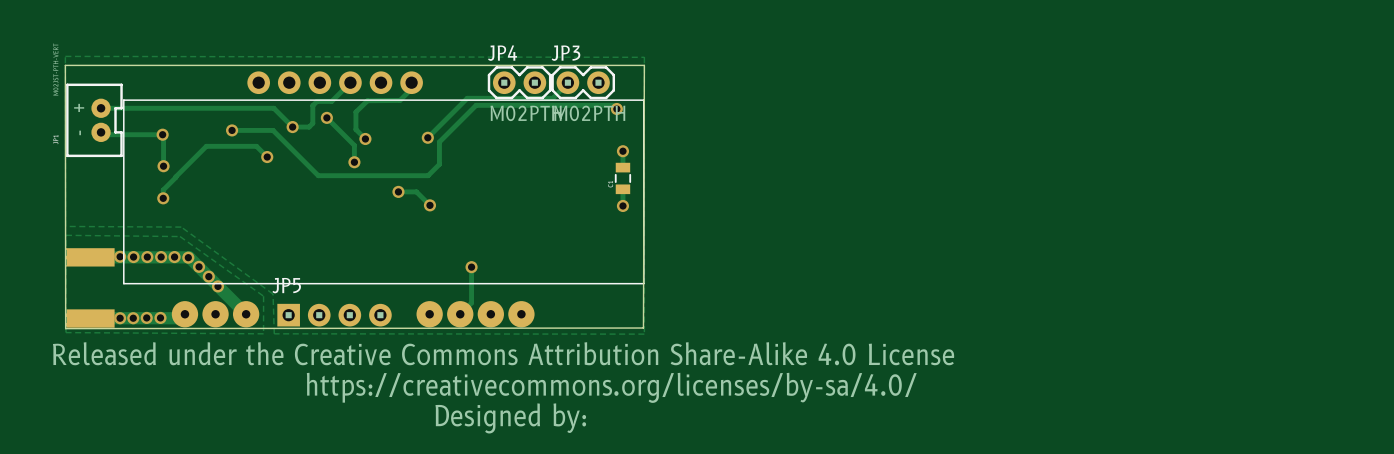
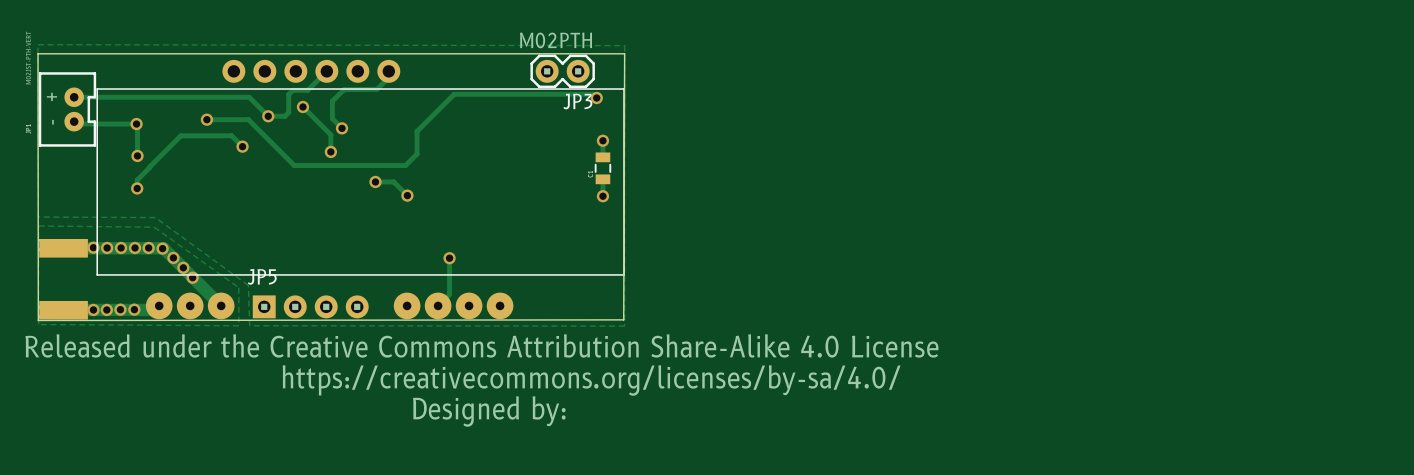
JP3 name position: JP3 (566, 53) -> JP3 (577, 101)
JP4: M02PTH (519, 82) -> none
track: (567, 82) (552, 98) (467, 98) (427, 137) -> none
JP3 value position: M02PTH (589, 113) -> M02PTH (556, 40)
via: (427, 137) -> none

